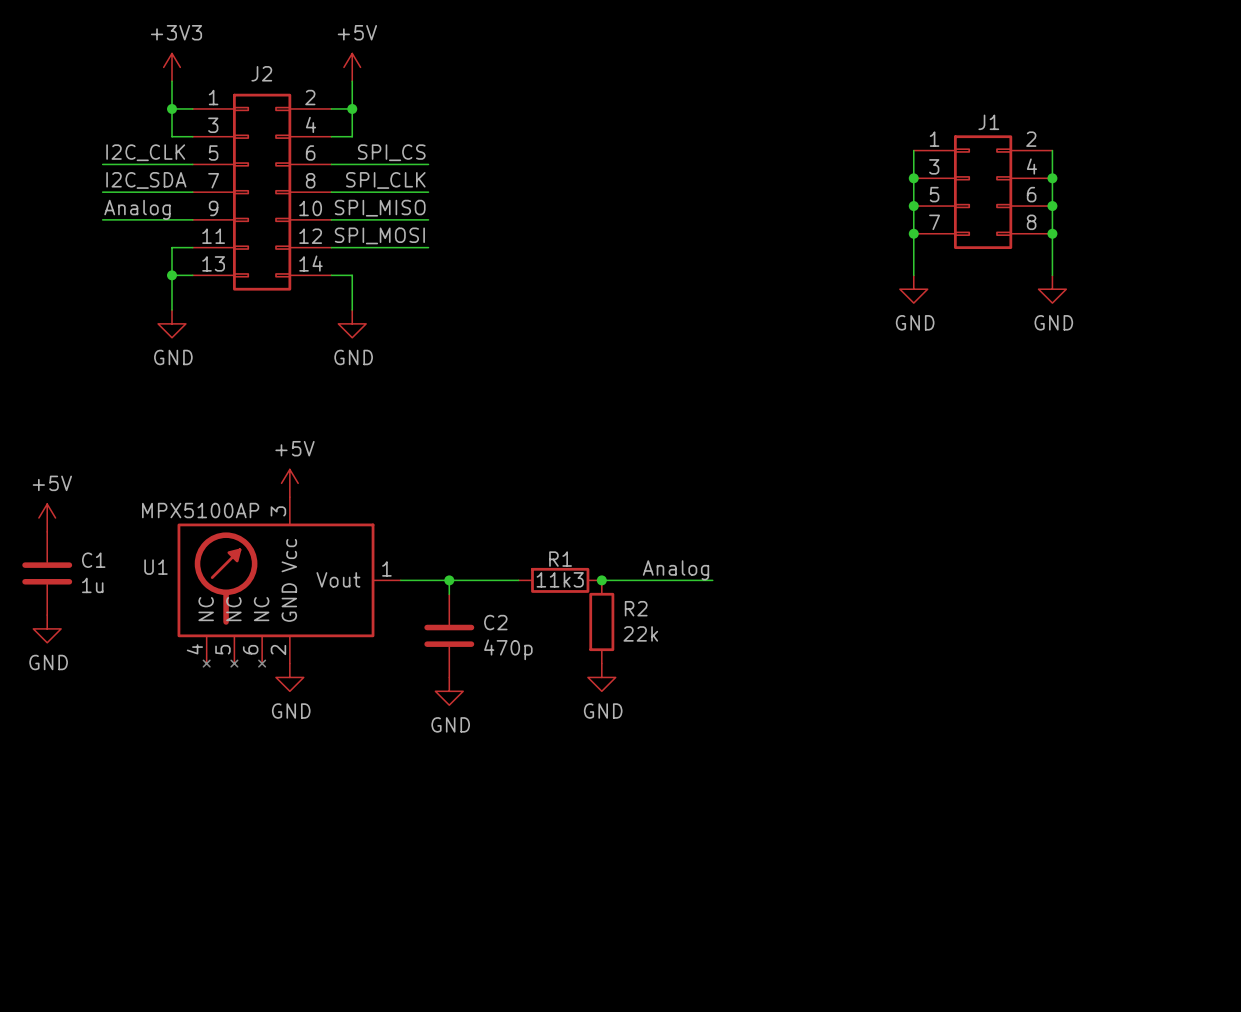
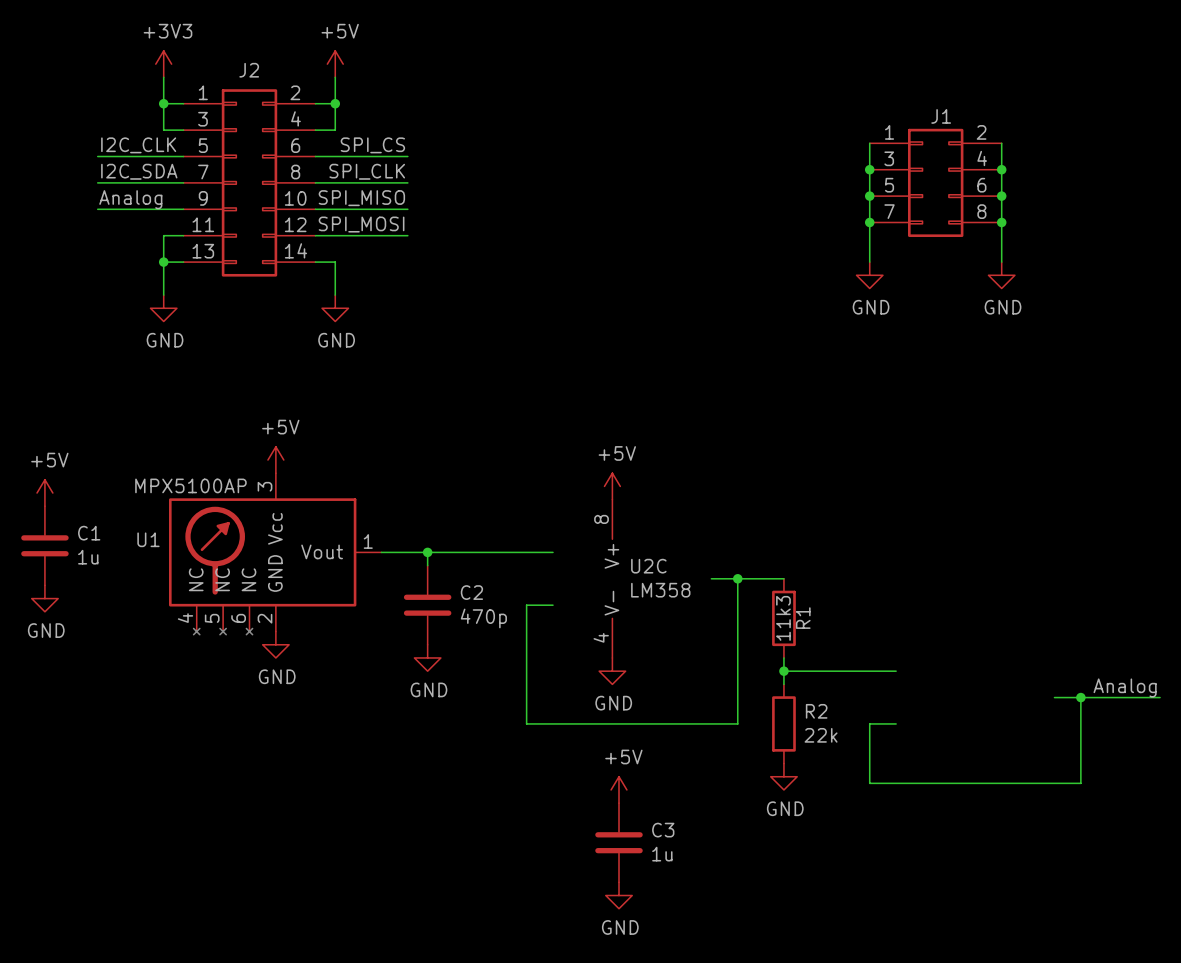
power symbol: none -> +5V (612, 486)
label: Analog (675, 570) -> none
wire: none -> (493, 552) (553, 552)
R1 rotation: 0° (560, 580) -> 90° clockwise (783, 618)
R1 position: (560, 580) -> (783, 618)
wire: (601, 580) (712, 580) -> none
junction: (601, 580) -> none
U2C: none -> LM358 (612, 578)
wire: none -> (711, 578) (783, 578)
wire: none -> (737, 578) (737, 723) (526, 723) (526, 605) (553, 605)
junction: none -> (737, 578)
R2 position: (601, 621) -> (783, 723)
power symbol position: GND (601, 677) -> GND (612, 671)
wire: none -> (783, 657) (783, 684)
wire: none -> (783, 671) (896, 671)
junction: none -> (783, 671)
label: none -> Analog (1125, 687)
wire: none -> (1054, 697) (1160, 697)
wire: none -> (1080, 697) (1080, 783) (869, 783) (869, 723) (896, 723)
junction: none -> (1080, 697)
power symbol: none -> GND (783, 776)
power symbol: none -> +5V (618, 789)
C3: none -> 1u (618, 842)
power symbol: none -> GND (618, 895)

